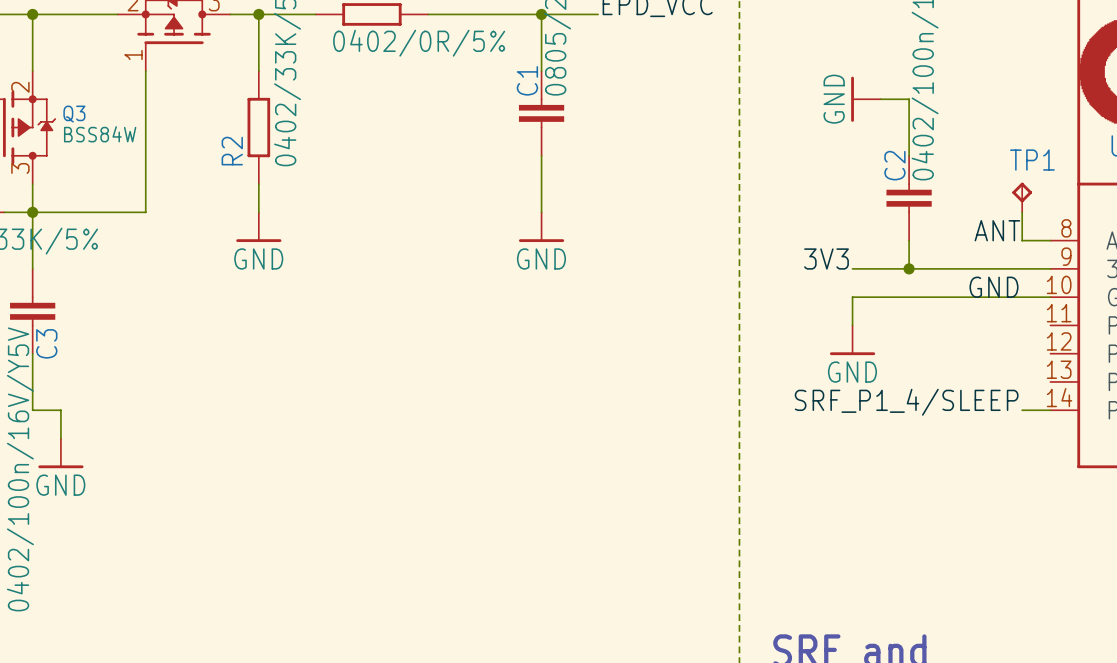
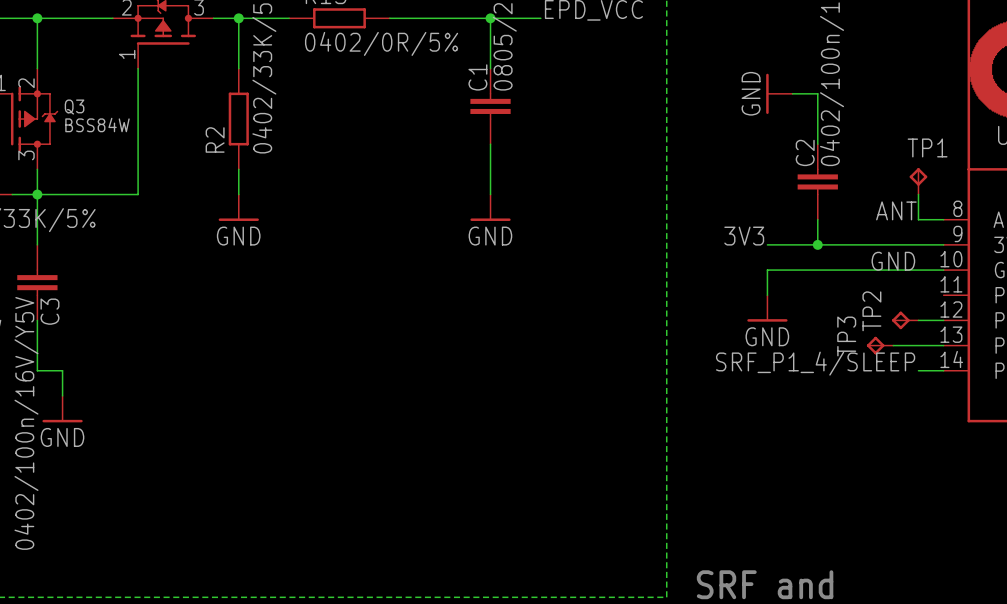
TP2: none -> (905, 320)
wire: none -> (918, 320) (943, 320)
TP3: none -> (880, 345)
wire: none -> (893, 345) (943, 345)

